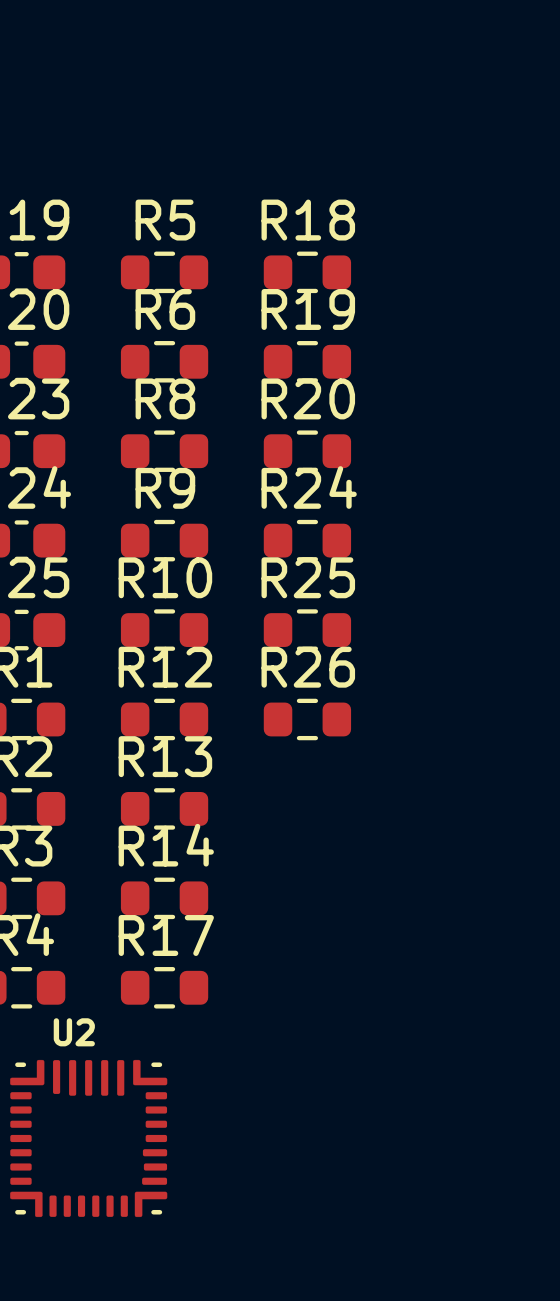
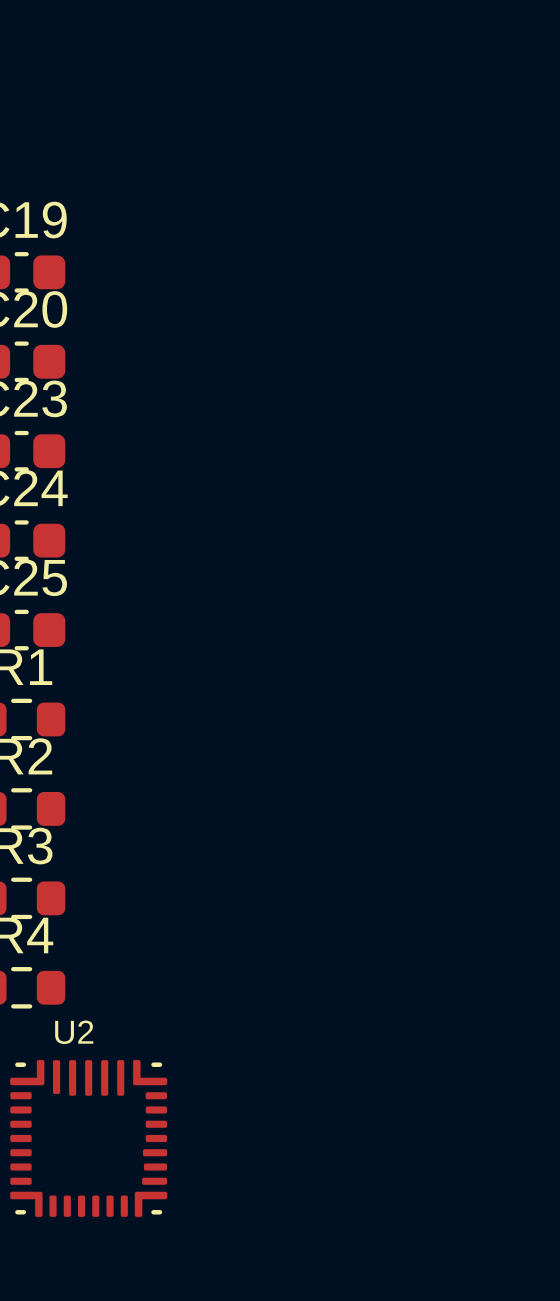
R5: (164, 272) -> none
R18: (307, 272) -> none
R6: (164, 361) -> none
R19: (307, 361) -> none
R8: (164, 451) -> none
R20: (307, 451) -> none
R9: (164, 540) -> none
R24: (307, 540) -> none
R10: (164, 630) -> none
R25: (307, 630) -> none
R12: (164, 719) -> none
R26: (307, 719) -> none
R13: (164, 808) -> none
R14: (164, 898) -> none
R17: (164, 987) -> none

